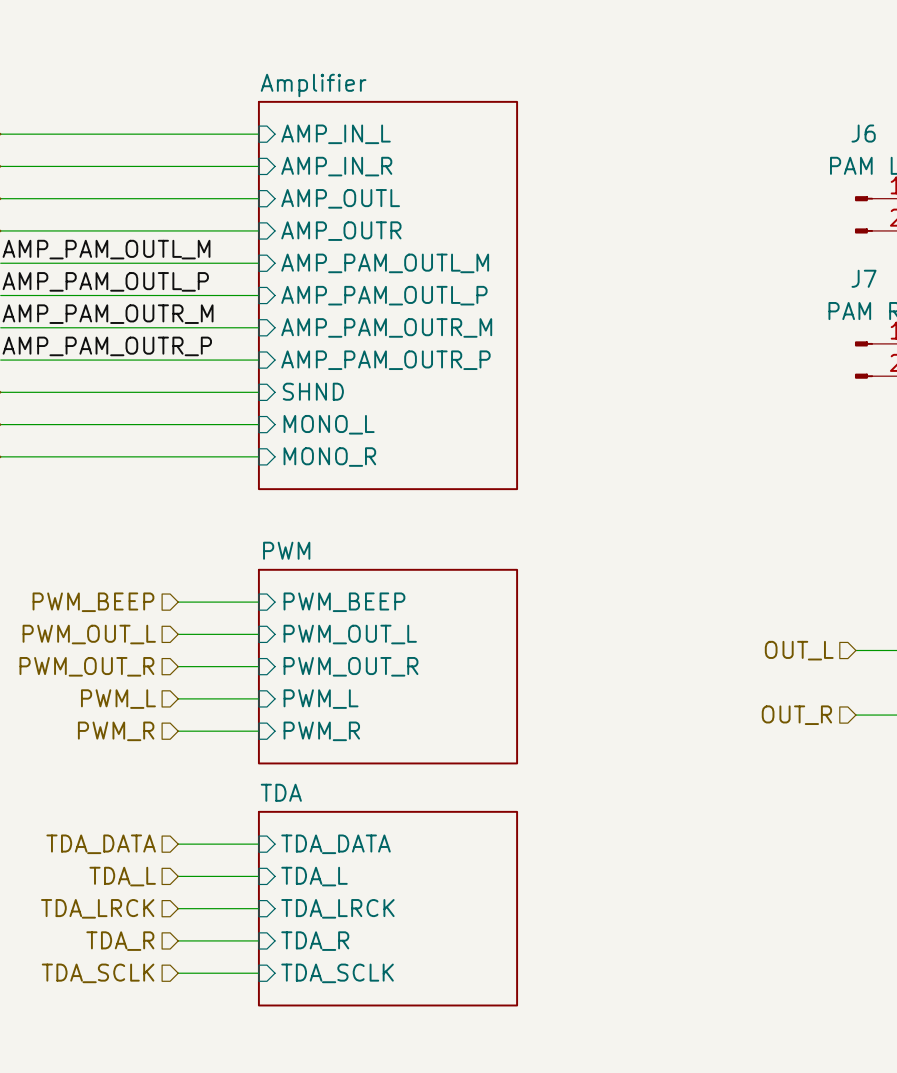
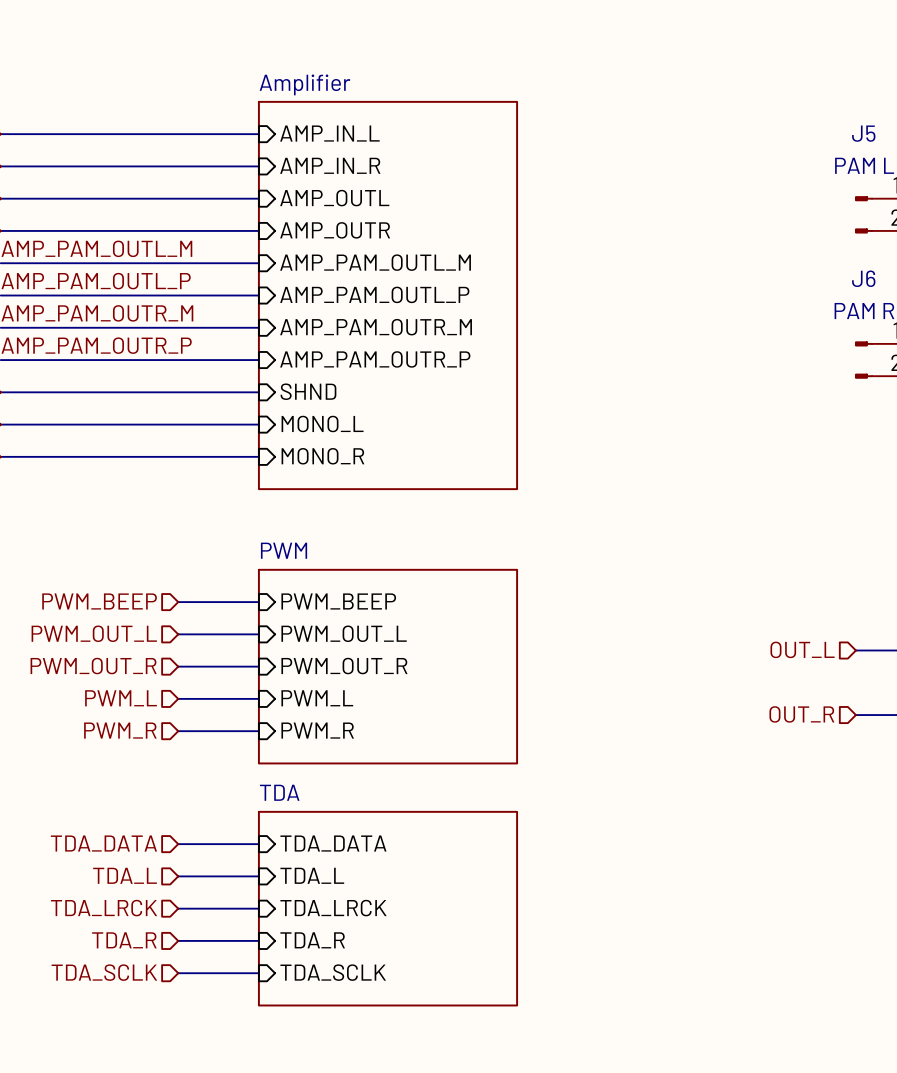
J6 name: J6 (863, 133) -> J5 (863, 133)
J7 name: J7 (864, 278) -> J6 (863, 278)

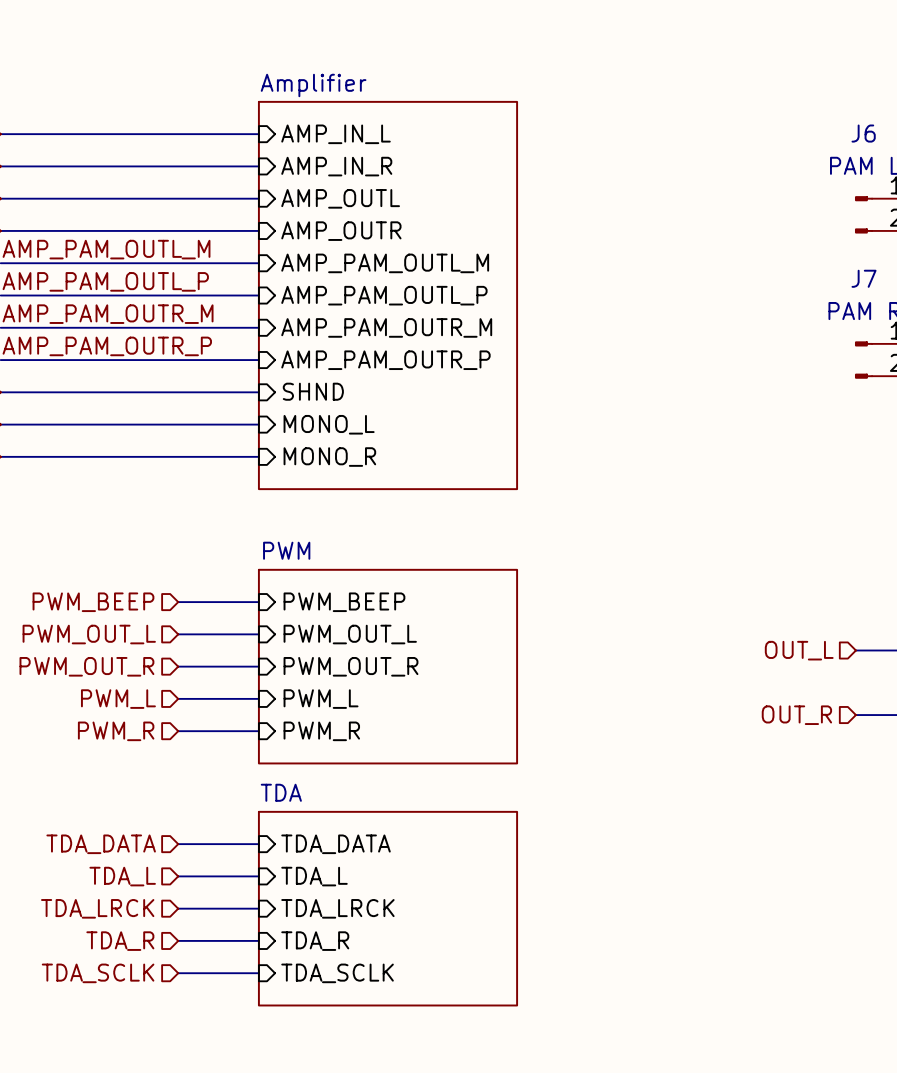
J5 name: J5 (863, 133) -> J6 (863, 133)
J6 name: J6 (863, 278) -> J7 (864, 278)

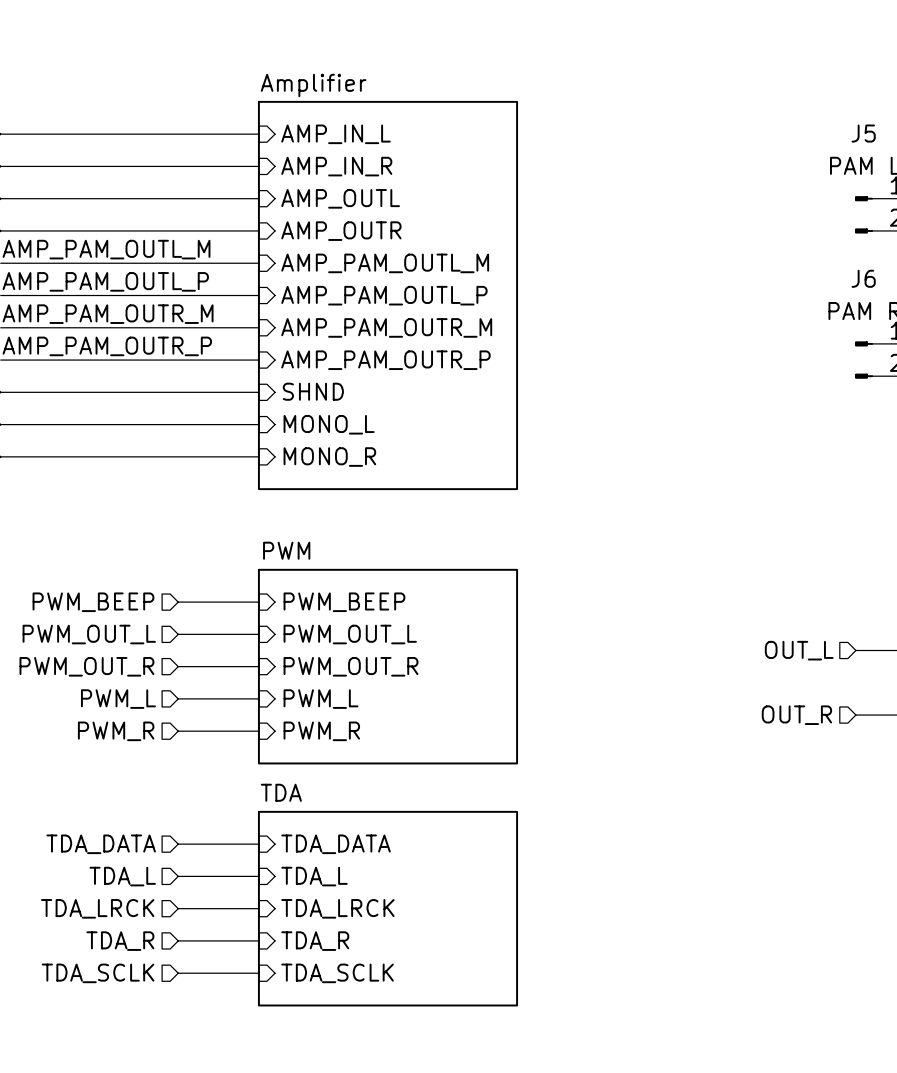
J6 name: J6 (863, 133) -> J5 (863, 133)
J7 name: J7 (864, 278) -> J6 (863, 278)

